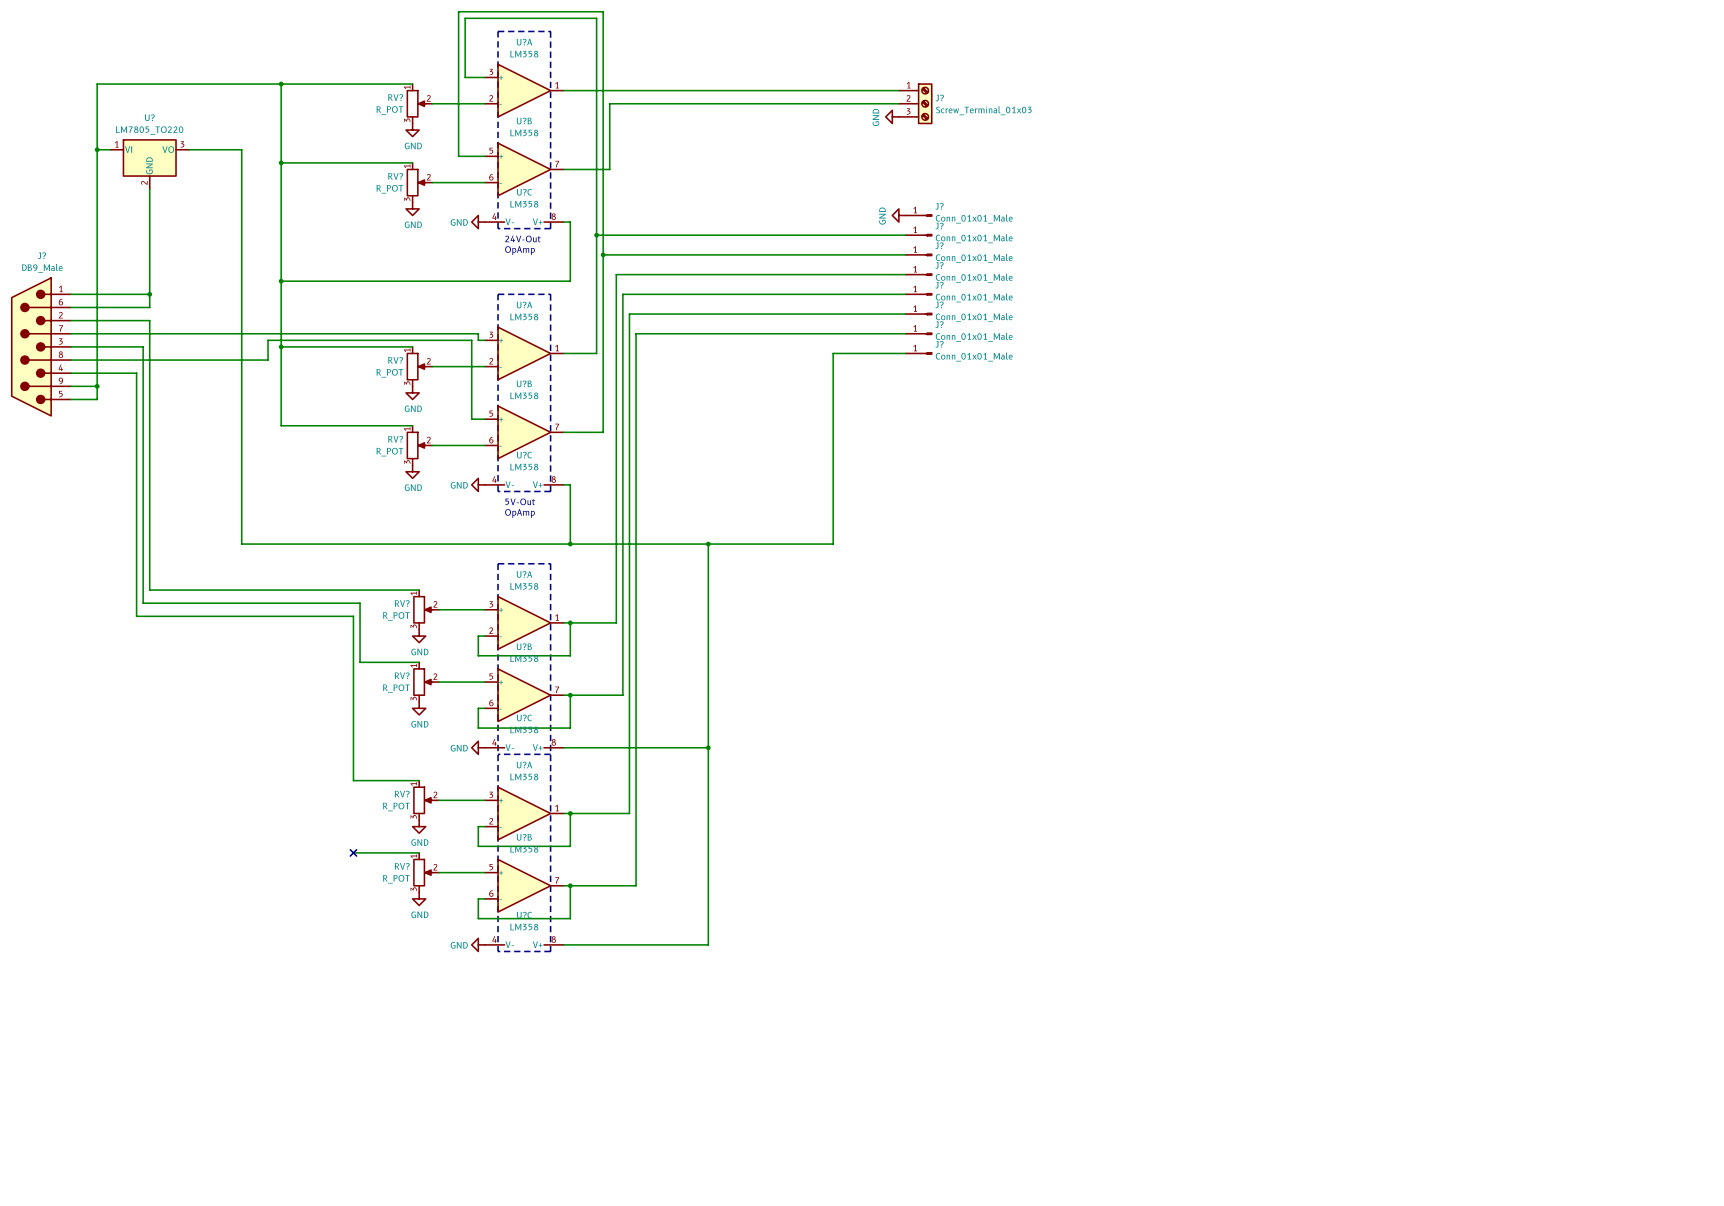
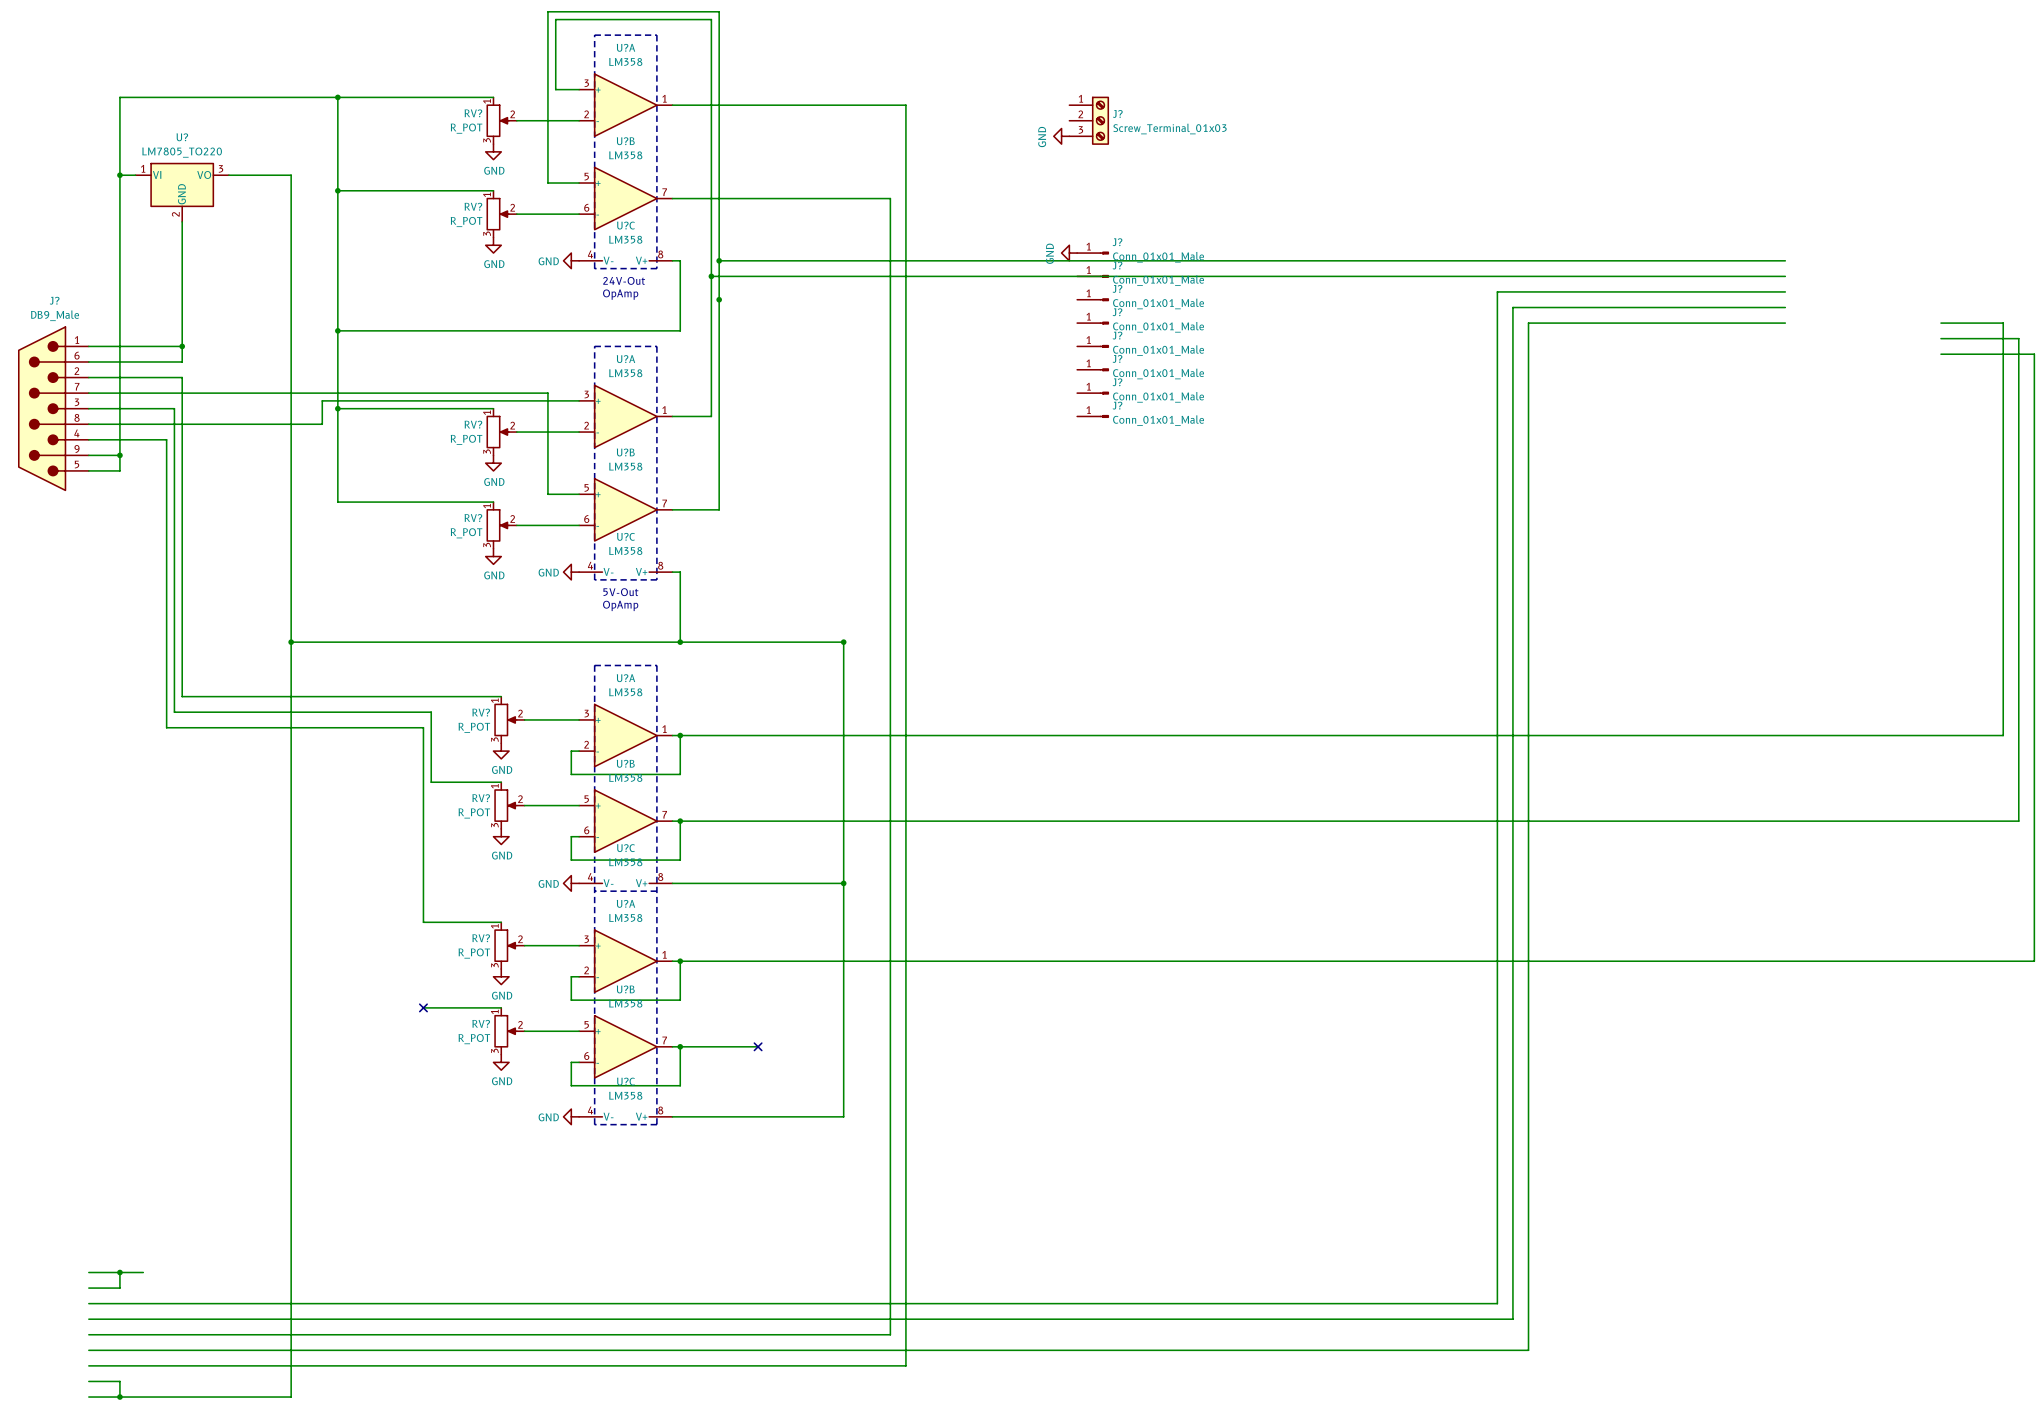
wire: (760, 90) (898, 90) -> (905, 105) (905, 1365) (88, 1365)
wire: (898, 103) (609, 103) (609, 169) -> (88, 1334) (890, 1334) (890, 198) (726, 198)
wire: none -> (719, 260) (1785, 260)
junction: none -> (719, 260)
wire: none -> (1077, 276) (1785, 276)
wire: none -> (1785, 291) (1497, 291) (1497, 1303) (88, 1303)
wire: (603, 254) (905, 254) -> none
wire: none -> (1785, 307) (1512, 307) (1512, 1319) (88, 1319)
wire: (905, 274) (616, 274) (616, 622) -> (1940, 323) (2003, 323) (2003, 735) (734, 735)
wire: none -> (1785, 323) (1528, 323) (1528, 1350) (88, 1350)
wire: (905, 294) (622, 294) (622, 695) -> (1940, 338) (2018, 338) (2018, 821) (742, 821)
wire: (905, 314) (629, 314) (629, 813) -> (1940, 354) (2034, 354) (2034, 961) (750, 961)
wire: (458, 333) (478, 333) (478, 340) -> (563, 400) (571, 400)
wire: (905, 333) (636, 333) (636, 885) -> none
wire: (471, 340) (471, 419) -> (547, 393) (547, 494) (563, 494)
wire: (905, 353) (833, 353) (833, 544) (708, 544) -> none
wire: none -> (291, 642) (291, 1397) (88, 1397)
junction: none -> (291, 642)
no-connect mark: none -> (758, 1046)
wire: none -> (88, 1272) (143, 1272)
wire: none -> (119, 1272) (119, 1288) (88, 1288)
junction: none -> (119, 1272)
wire: none -> (88, 1381) (119, 1381) (119, 1397)
junction: none -> (119, 1397)

